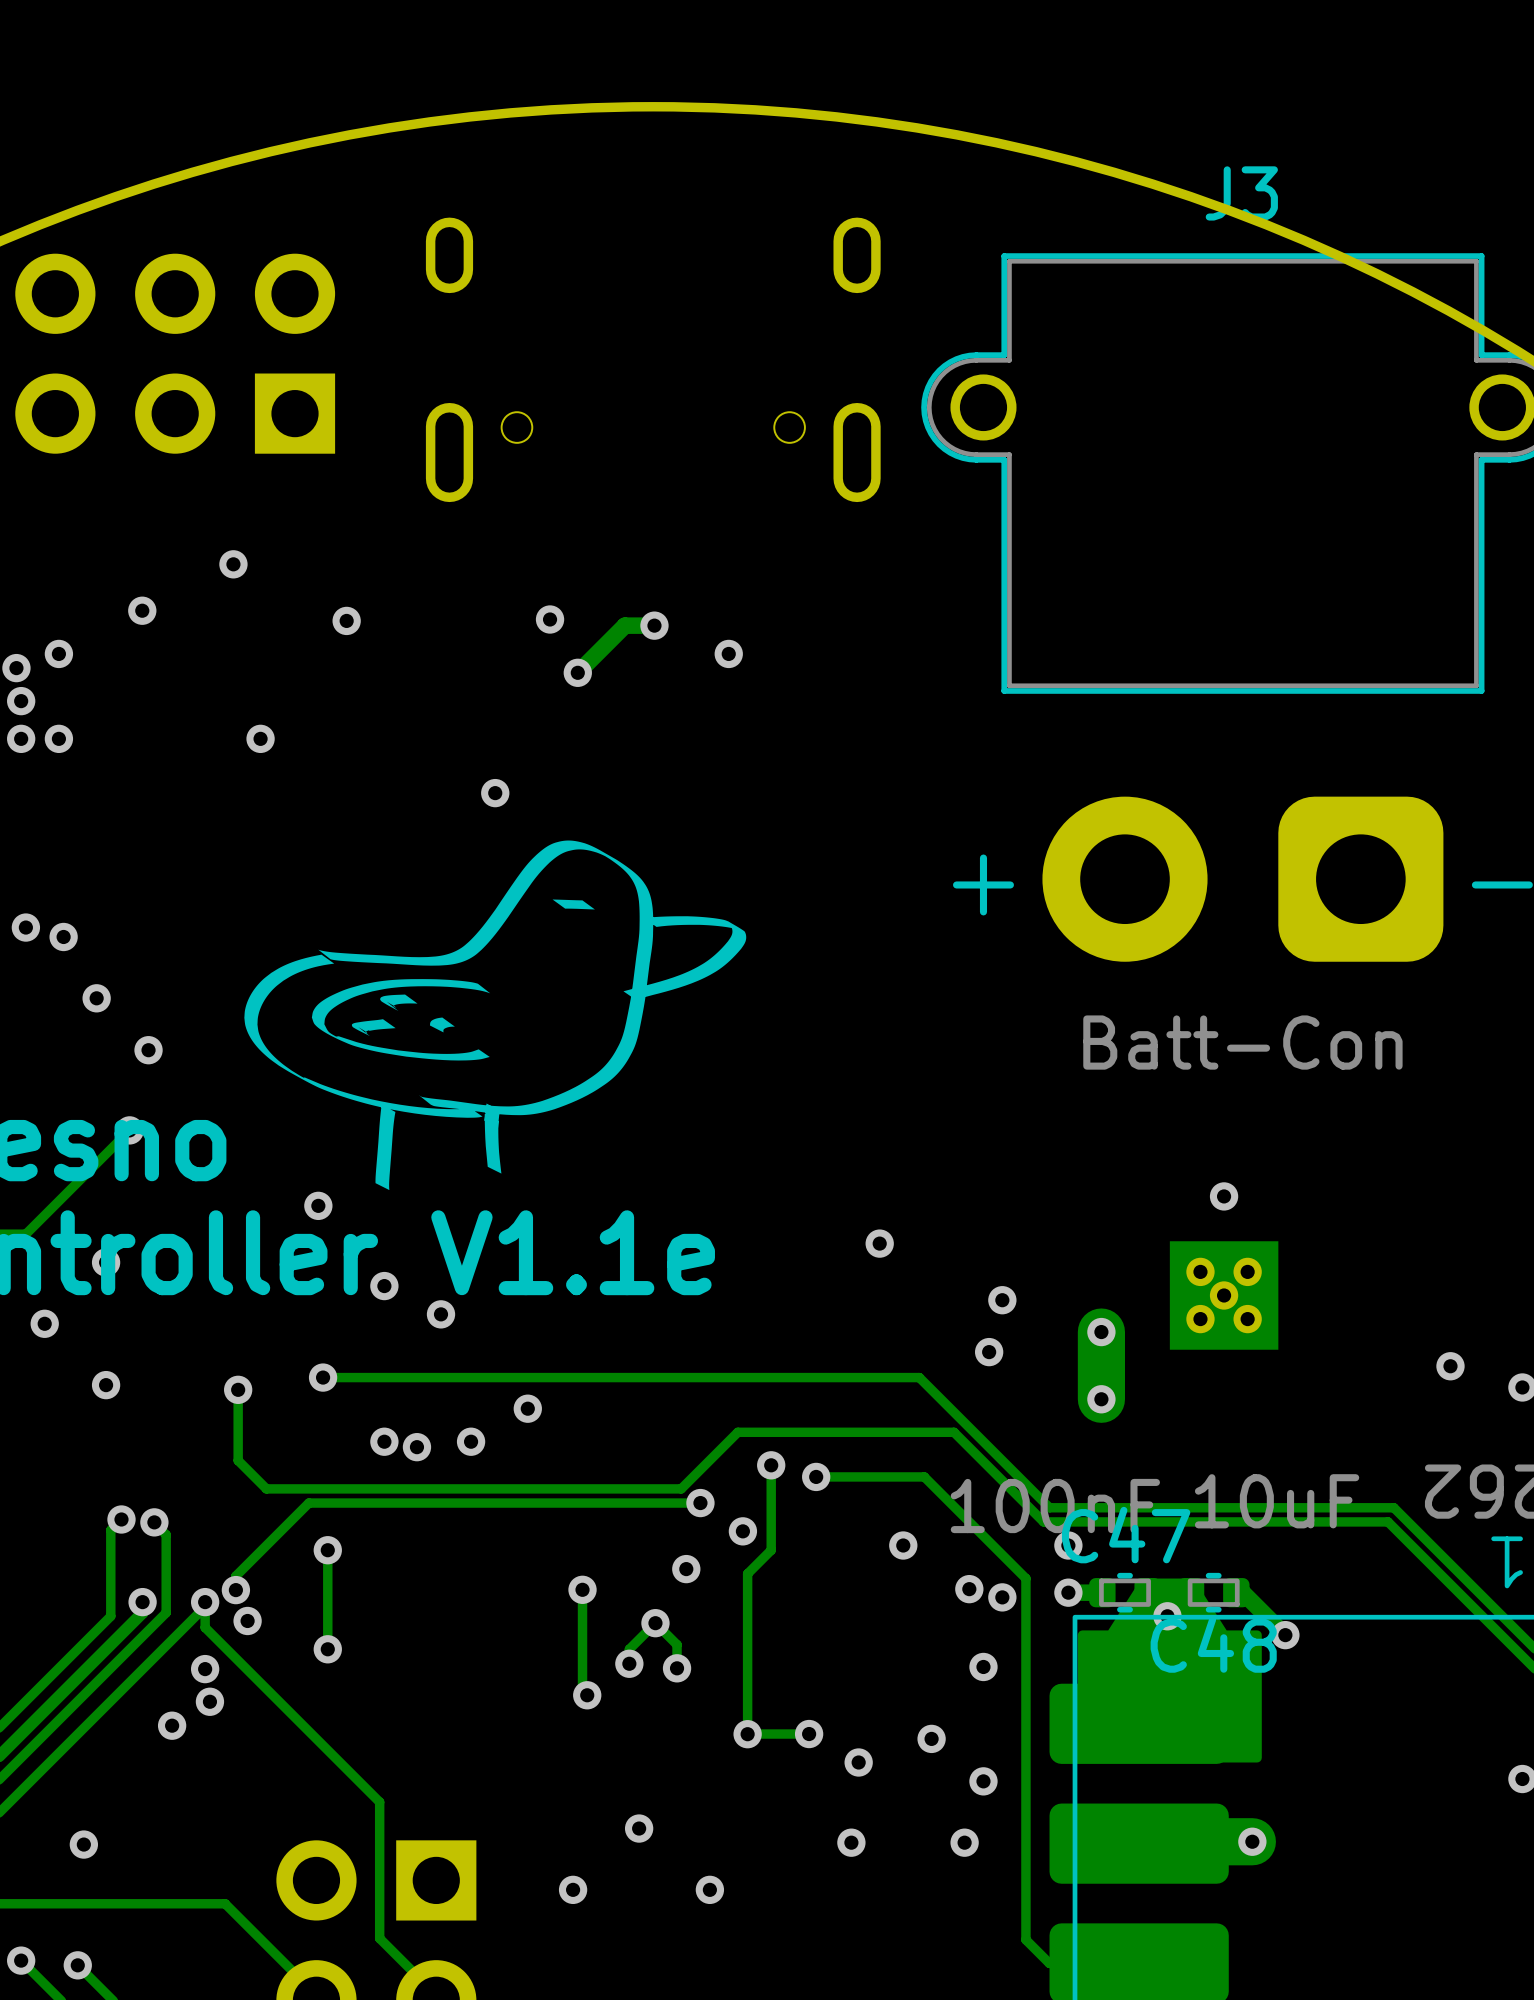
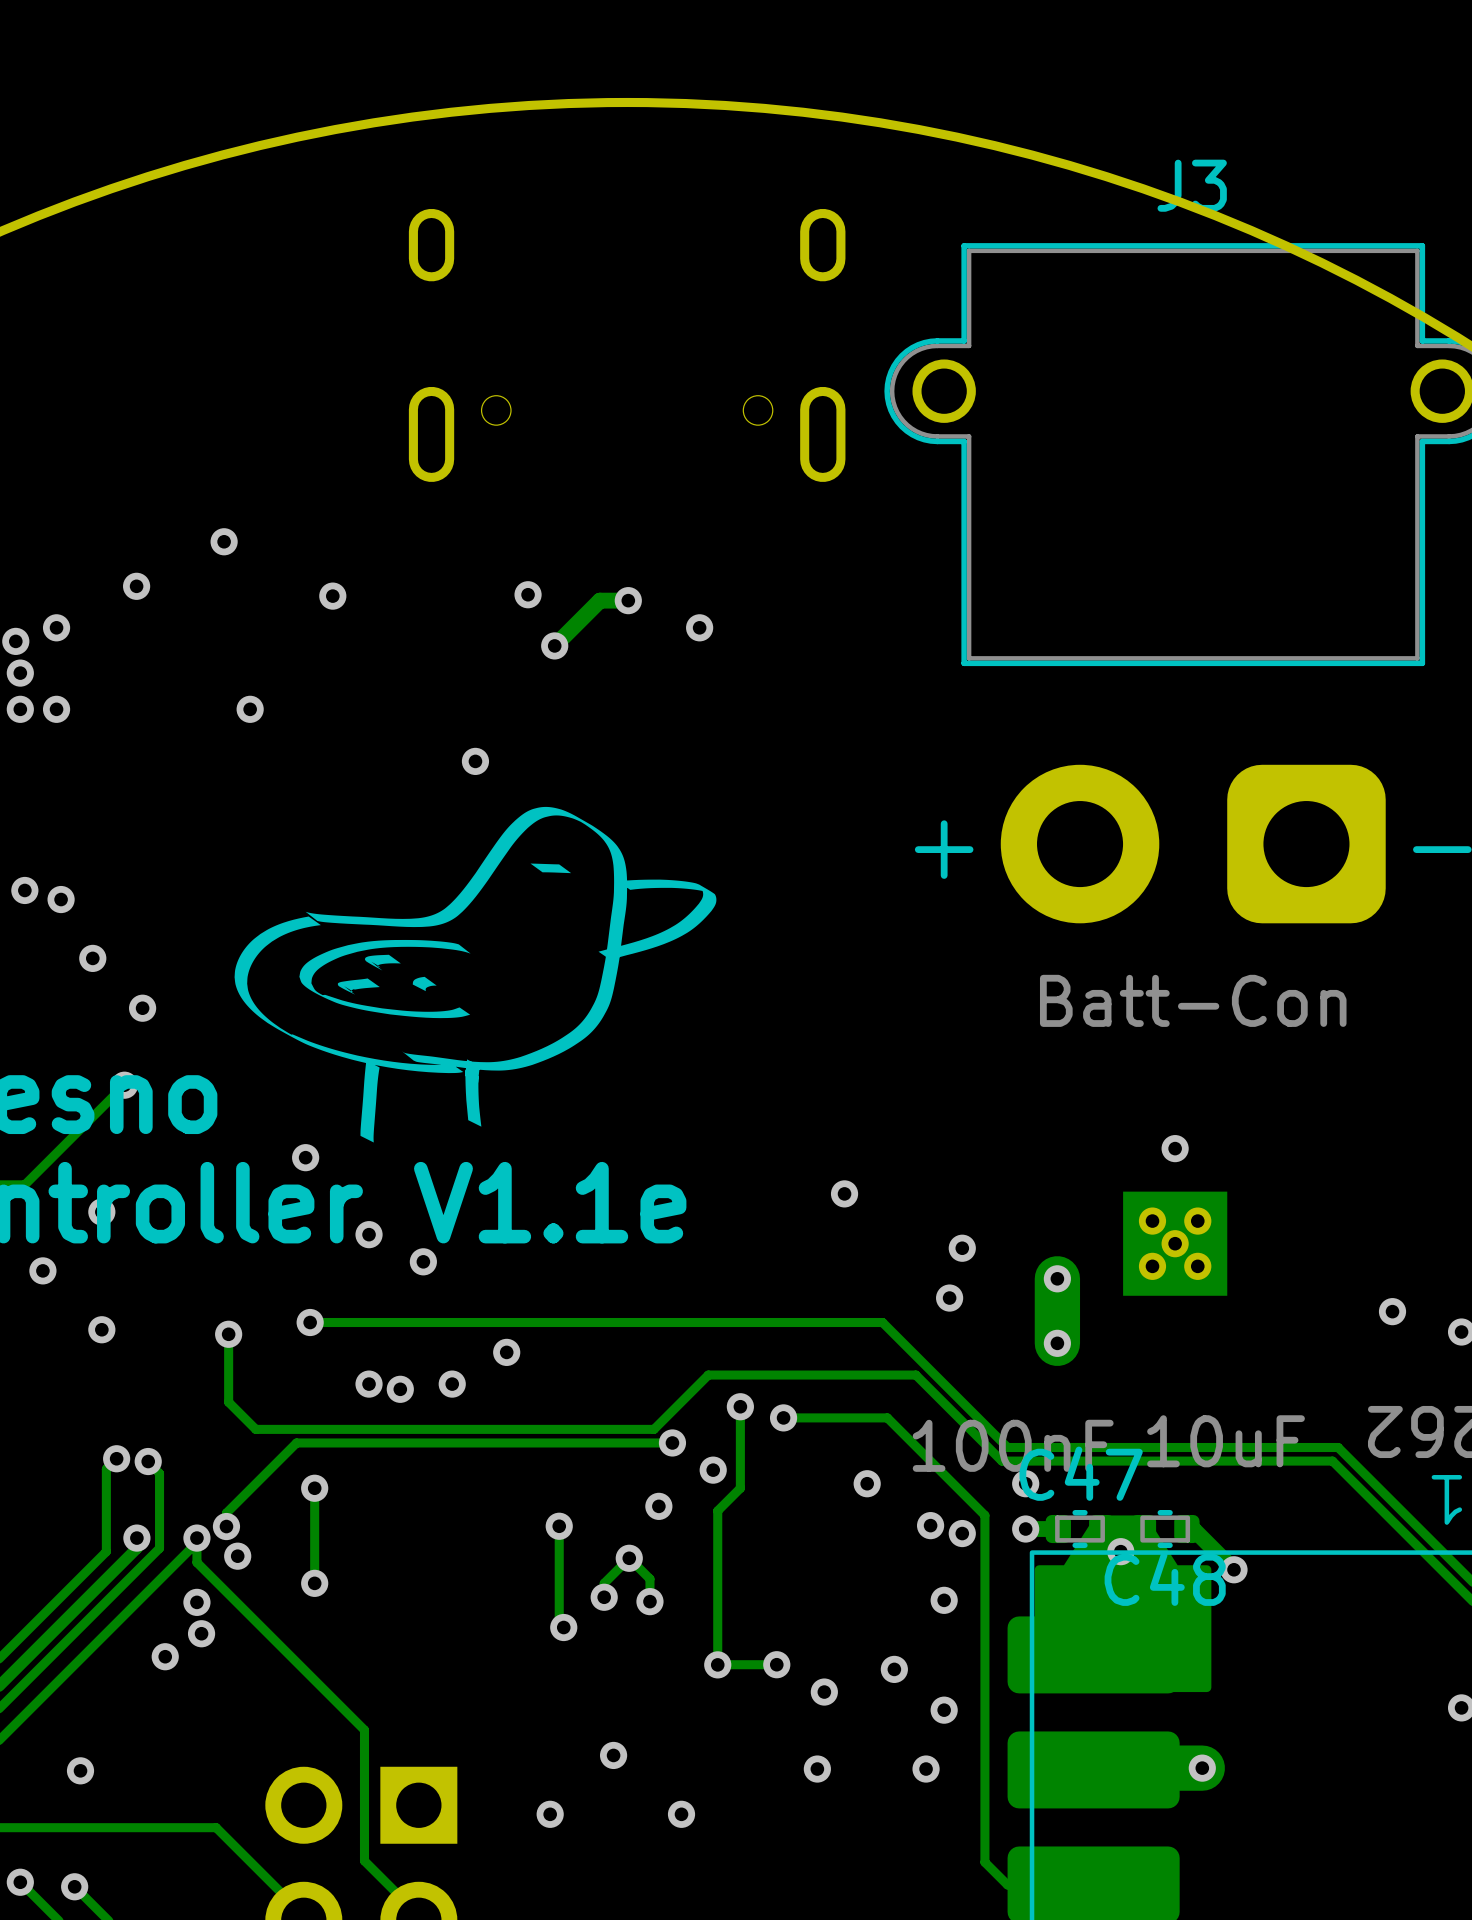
part: (175, 353) -> none

